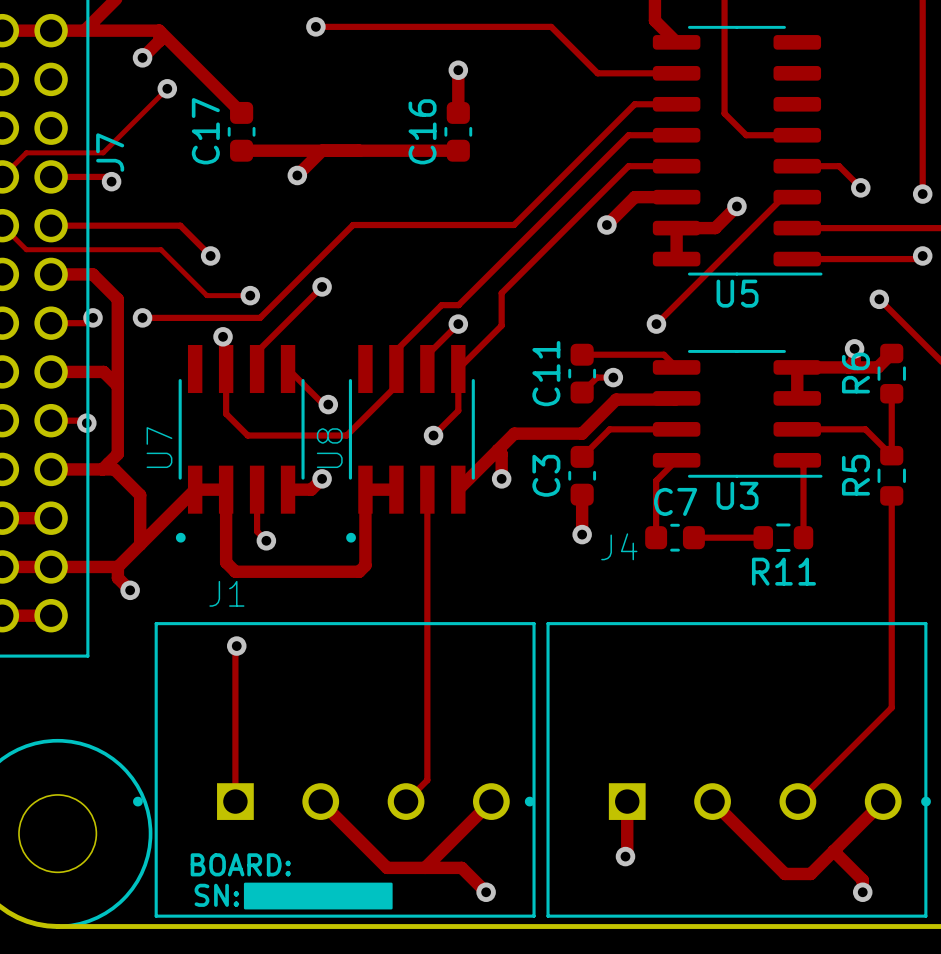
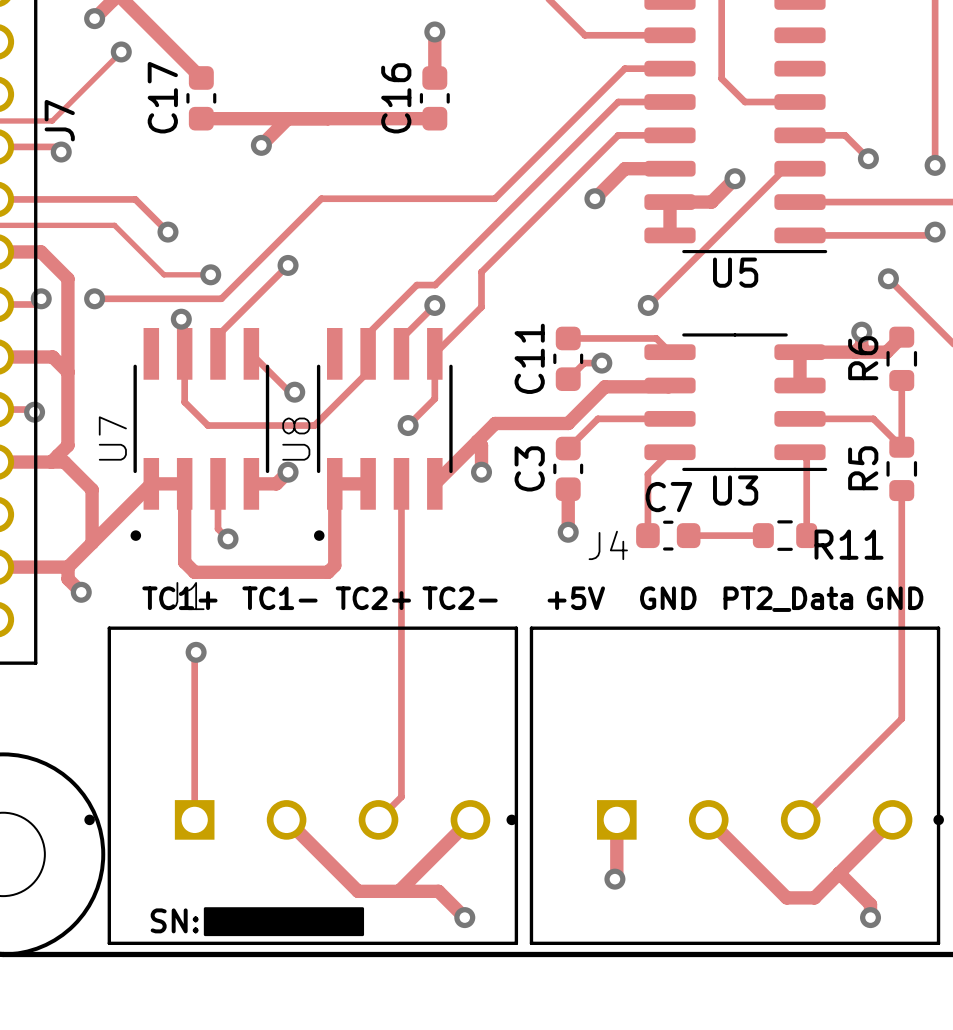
R11 name position: R11 (783, 571) -> R11 (849, 544)
text: none -> TC1+ (179, 598)
text: none -> TC1- (279, 598)
text: none -> TC2+ (373, 598)
text: none -> TC2- (460, 598)
text: none -> +5V (576, 598)
text: none -> GND (668, 598)
text: none -> GND (895, 598)
text: none -> PT2_Data (788, 599)
J7 text: BOARD: (240, 864) -> none

